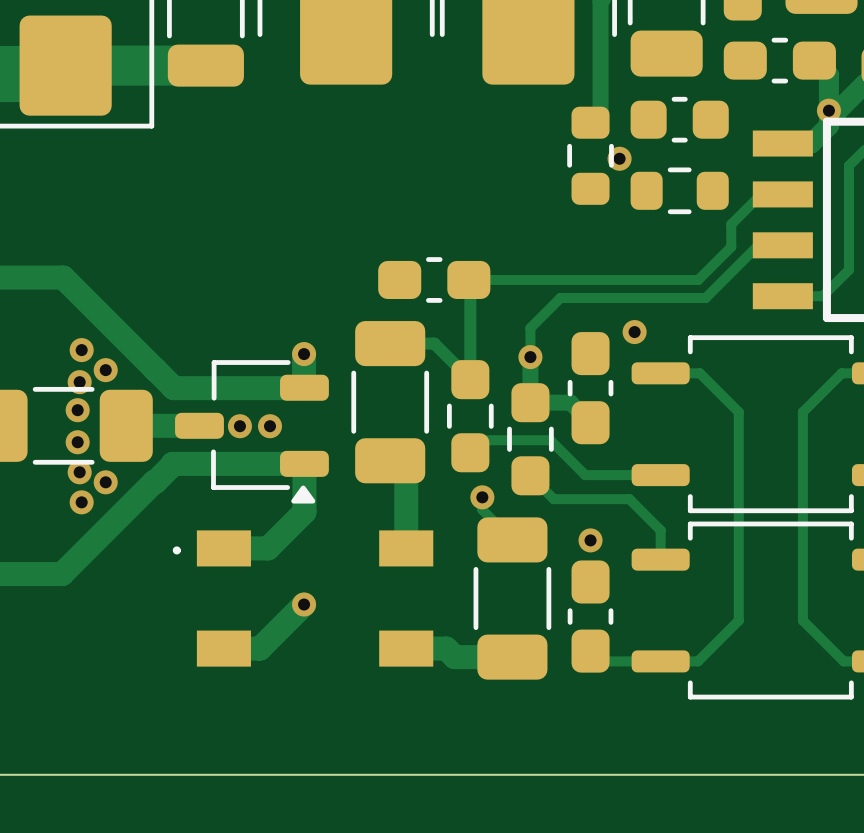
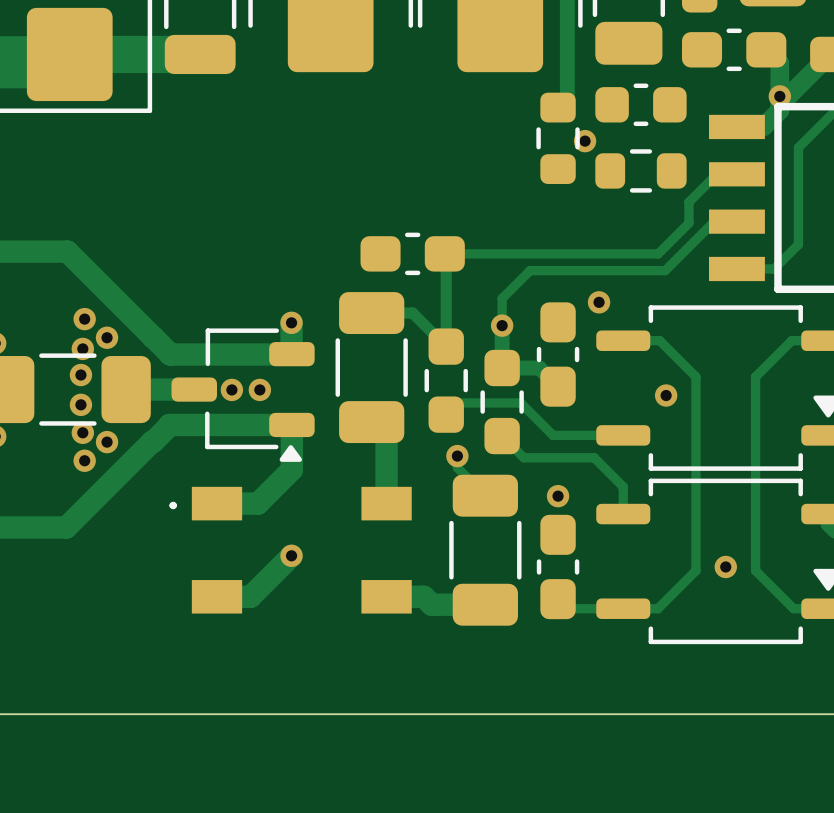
via: none -> (666, 395)
via: none -> (725, 566)

